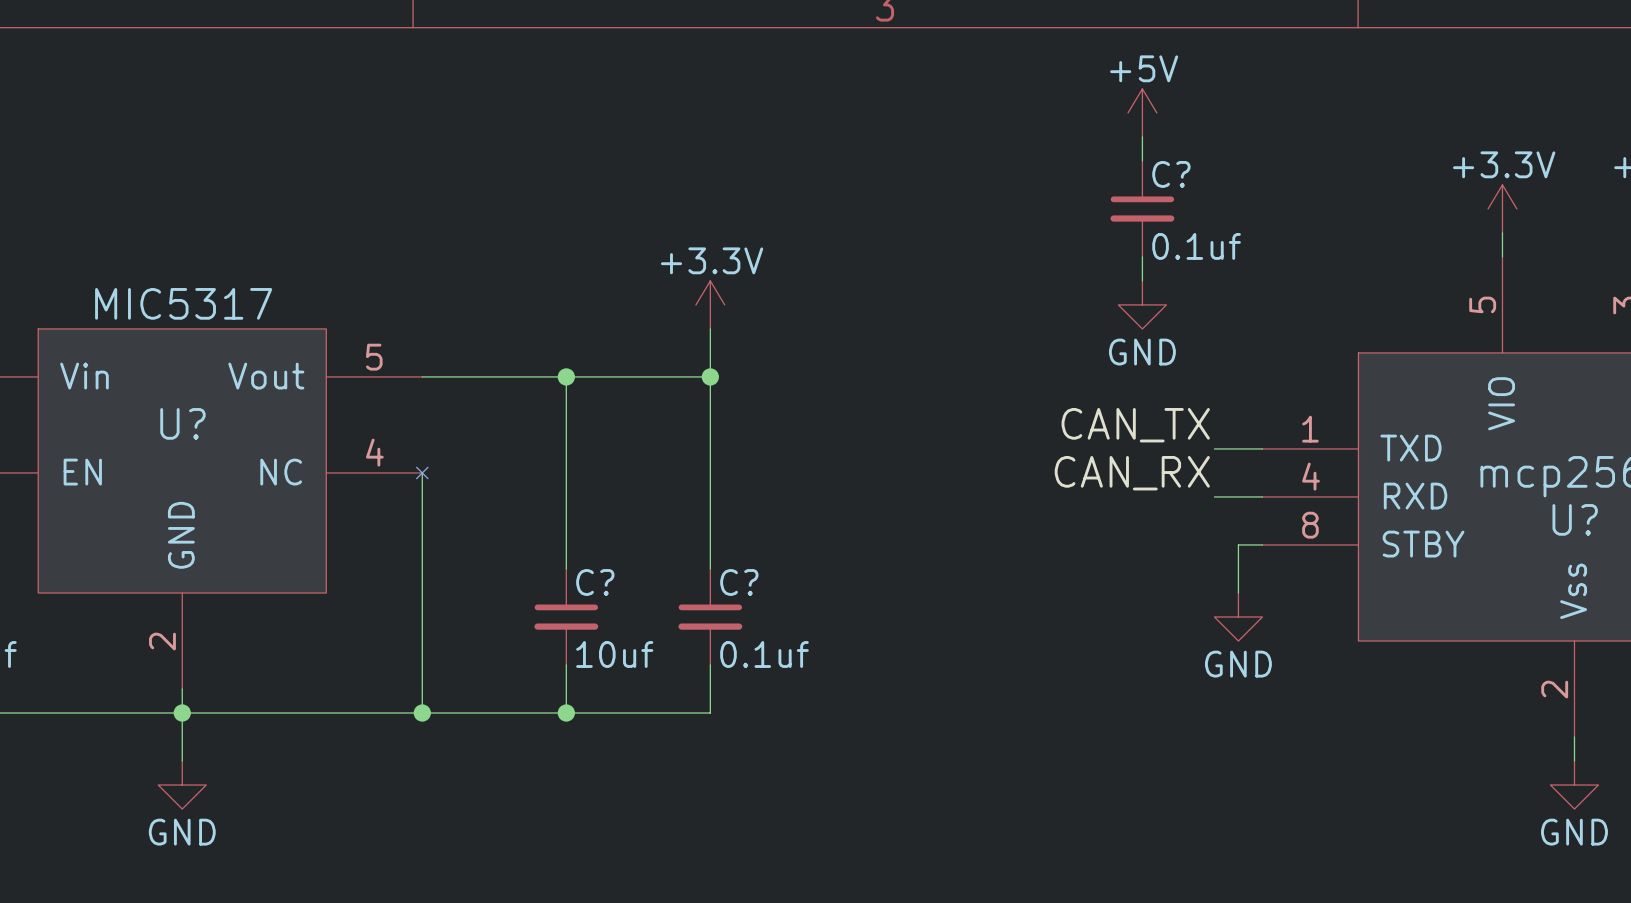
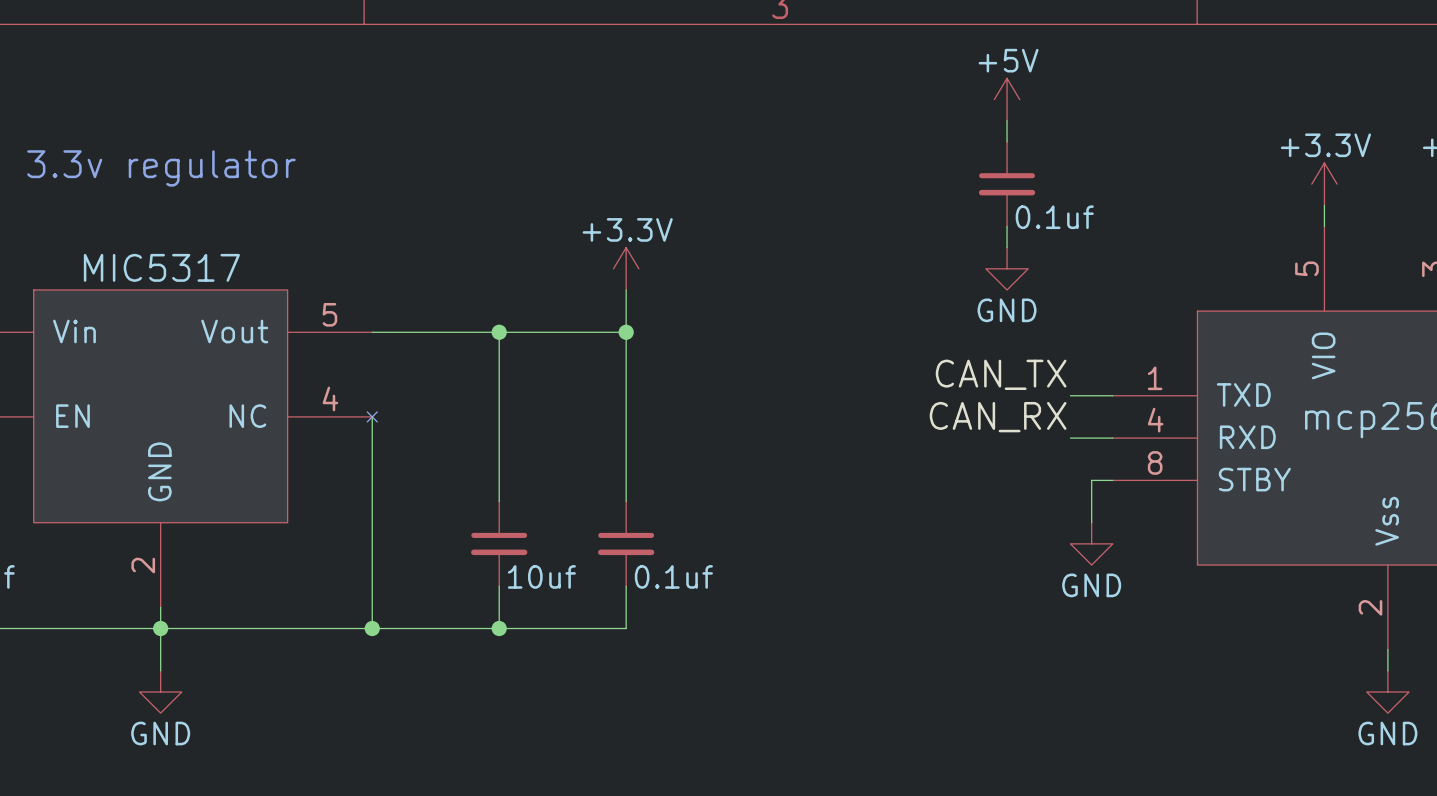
C? name: C? (1171, 174) -> none
text: none -> 3.3v regulator (161, 168)
U? name: U? (182, 423) -> none
U? name: U? (1575, 519) -> none
C? name: C? (595, 582) -> none
C? name: C? (739, 582) -> none

